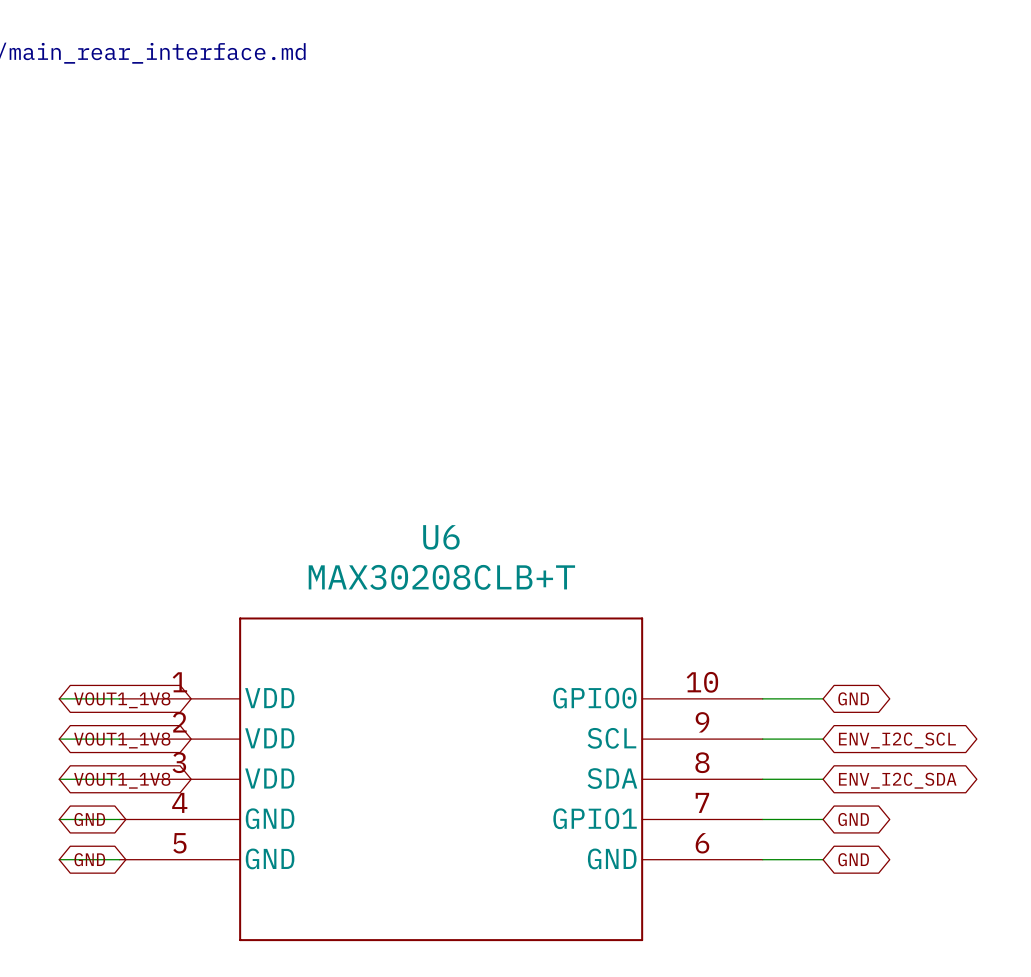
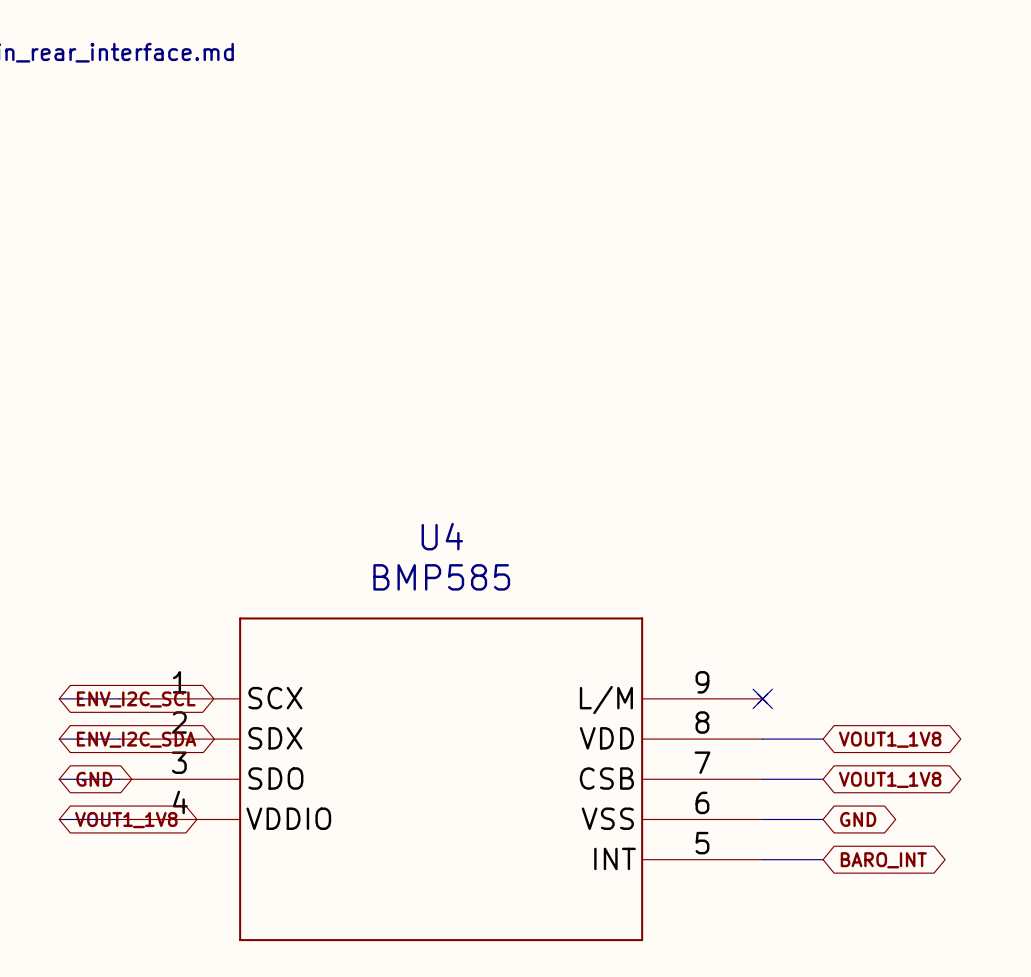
wire: (762, 698) (823, 698) -> none
no-connect mark: none -> (762, 698)
global label: GND (853, 698) -> none
global label: VOUT1_1V8 (122, 700) -> ENV_I2C_SCL (136, 699)
global label: VOUT1_1V8 (122, 740) -> ENV_I2C_SDA (136, 739)
global label: ENV_I2C_SCL (897, 740) -> VOUT1_1V8 (890, 739)
U6: MAX30208CLB+T (441, 779) -> none
U4: none -> BMP585 (443, 779)
global label: VOUT1_1V8 (122, 780) -> GND (94, 779)
global label: ENV_I2C_SDA (897, 780) -> VOUT1_1V8 (890, 779)
global label: GND (89, 819) -> VOUT1_1V8 (126, 820)
wire: (59, 859) (119, 859) -> none
global label: GND (89, 859) -> none
global label: GND (853, 859) -> BARO_INT (883, 860)

